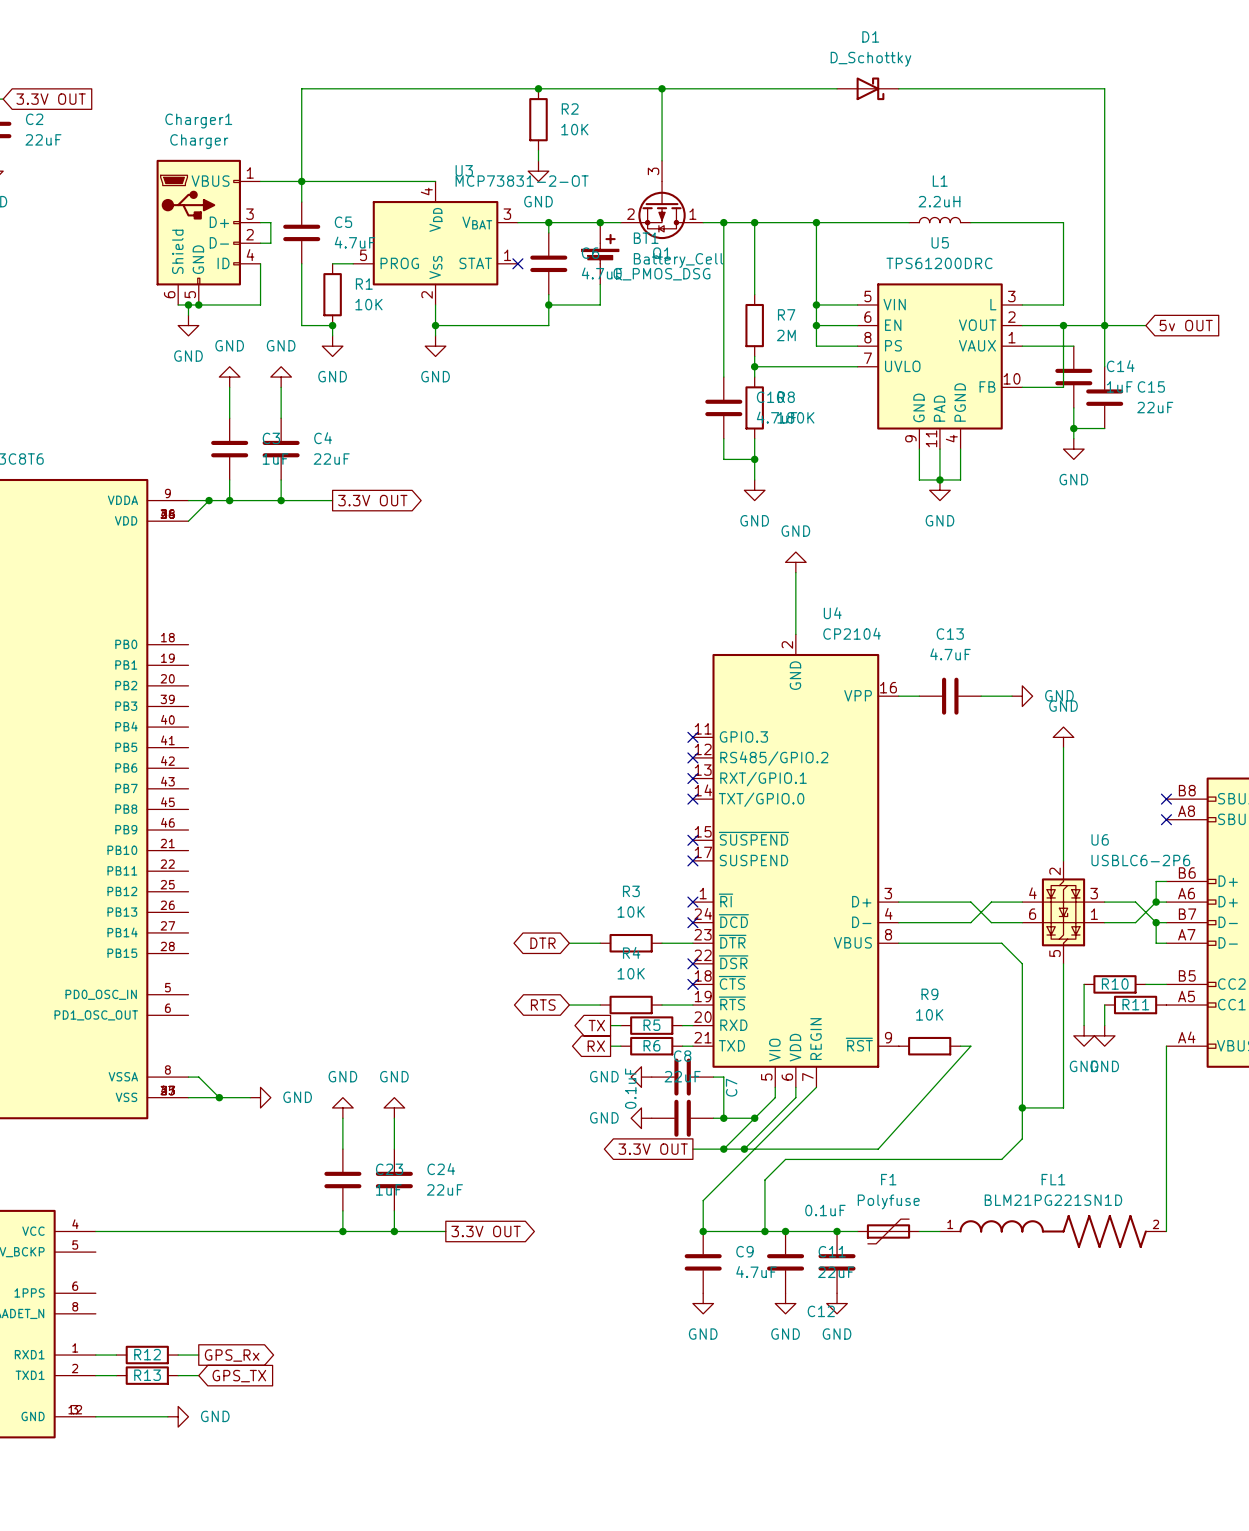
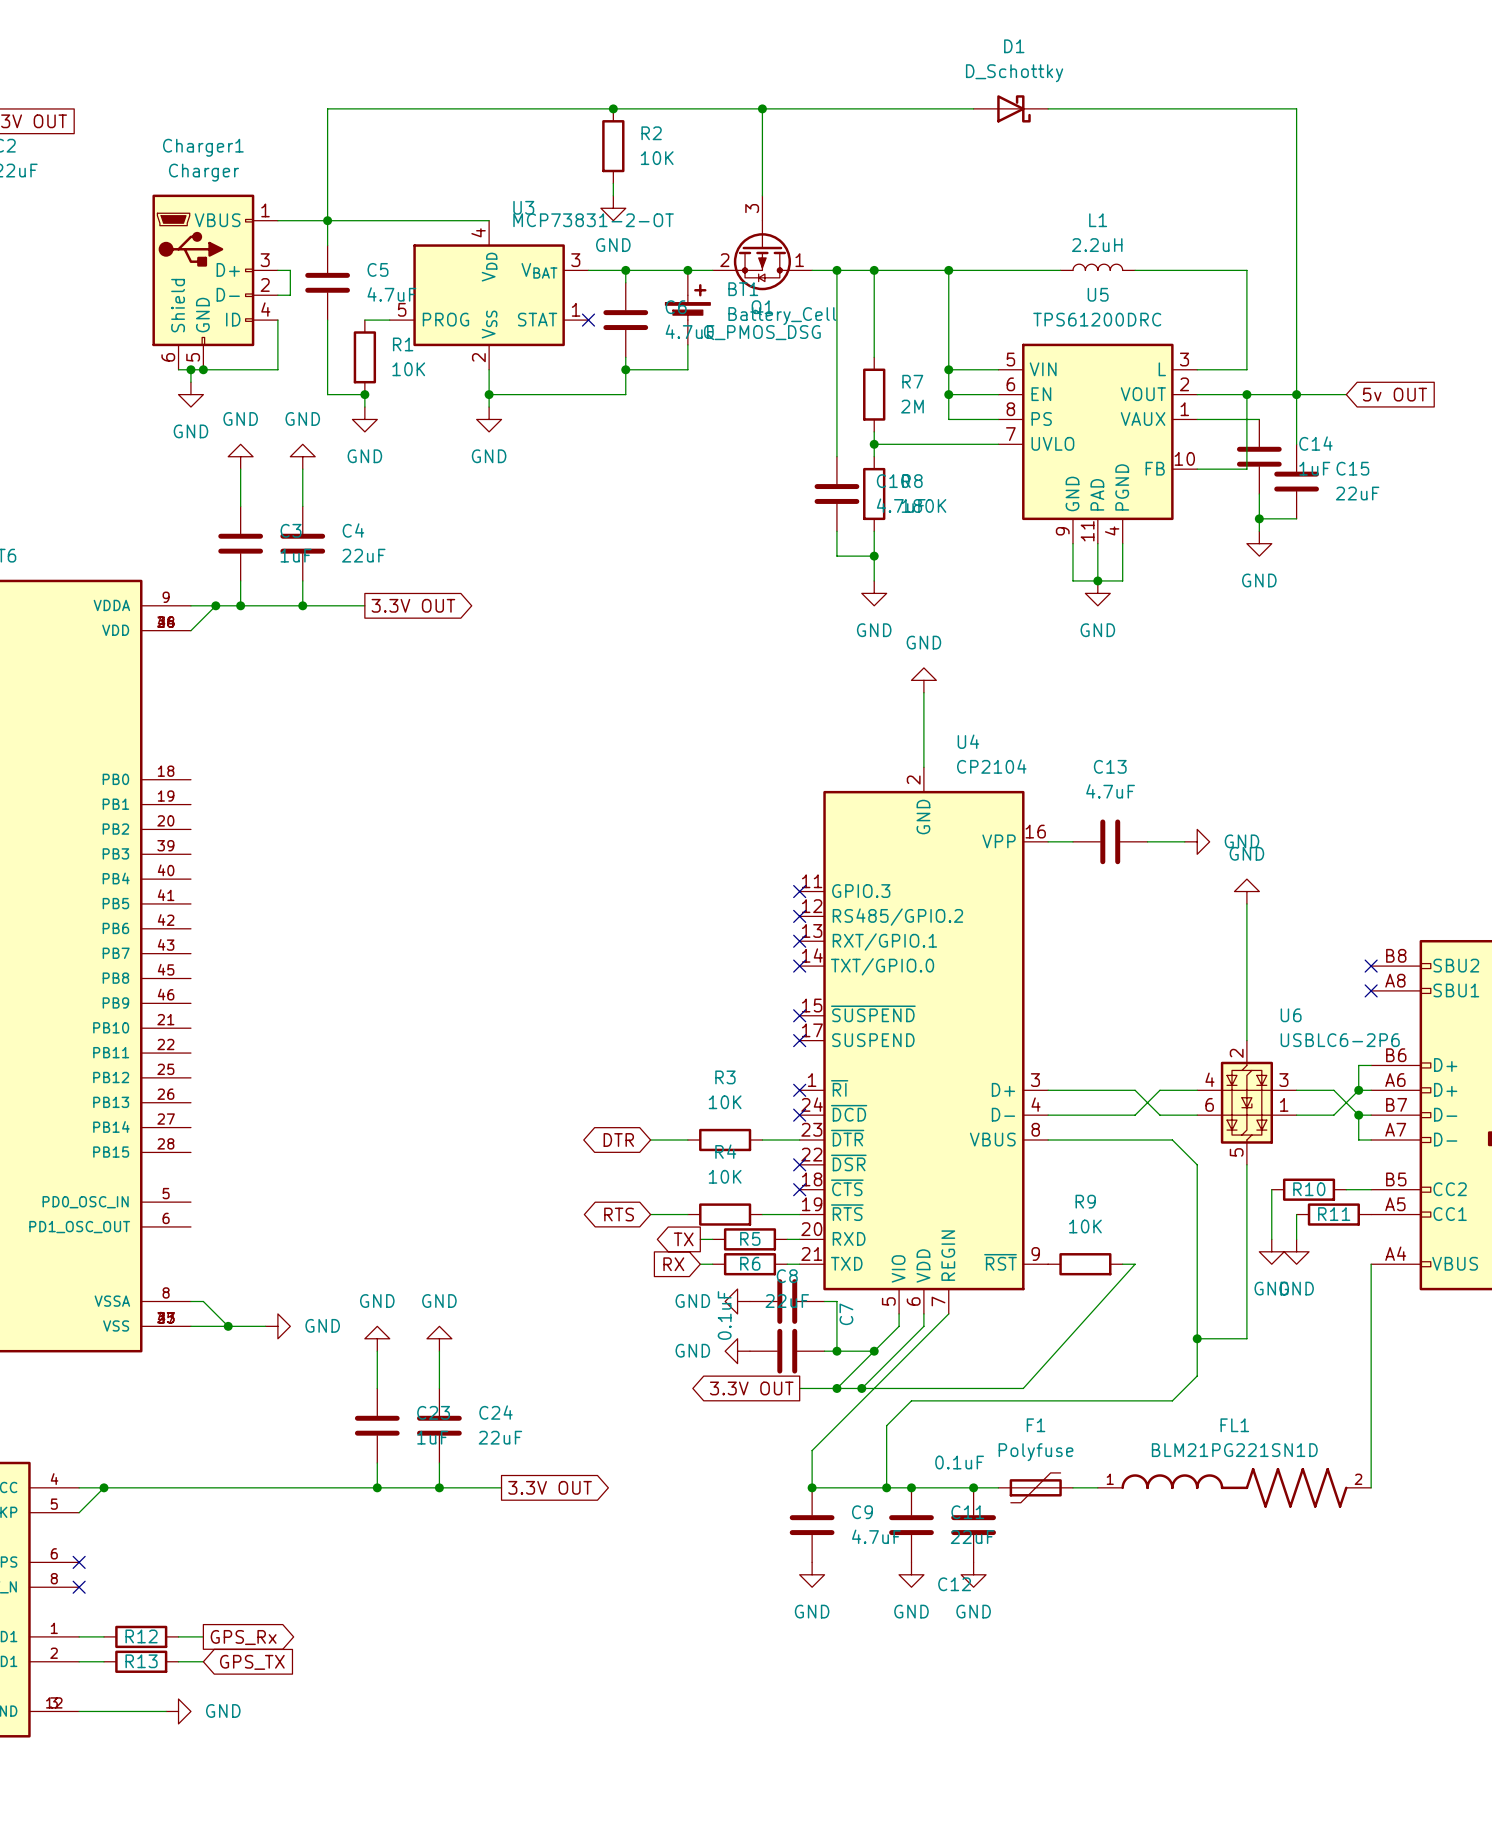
global label shape: output (596, 1046) -> input (673, 1264)
wire: none -> (103, 1487) (79, 1512)
junction: none -> (103, 1487)
no-connect mark: none -> (79, 1562)
no-connect mark: none -> (79, 1587)

